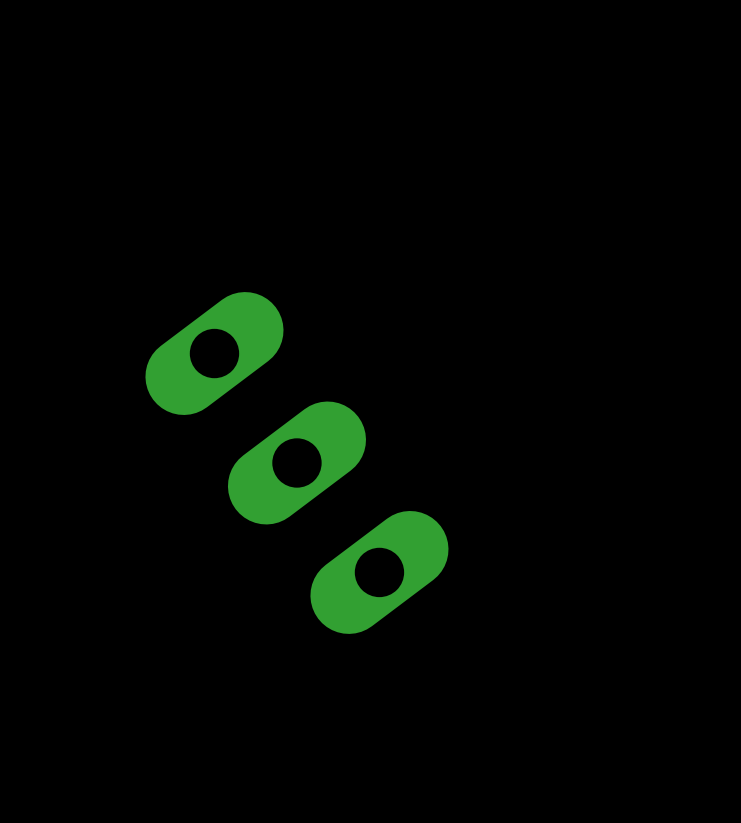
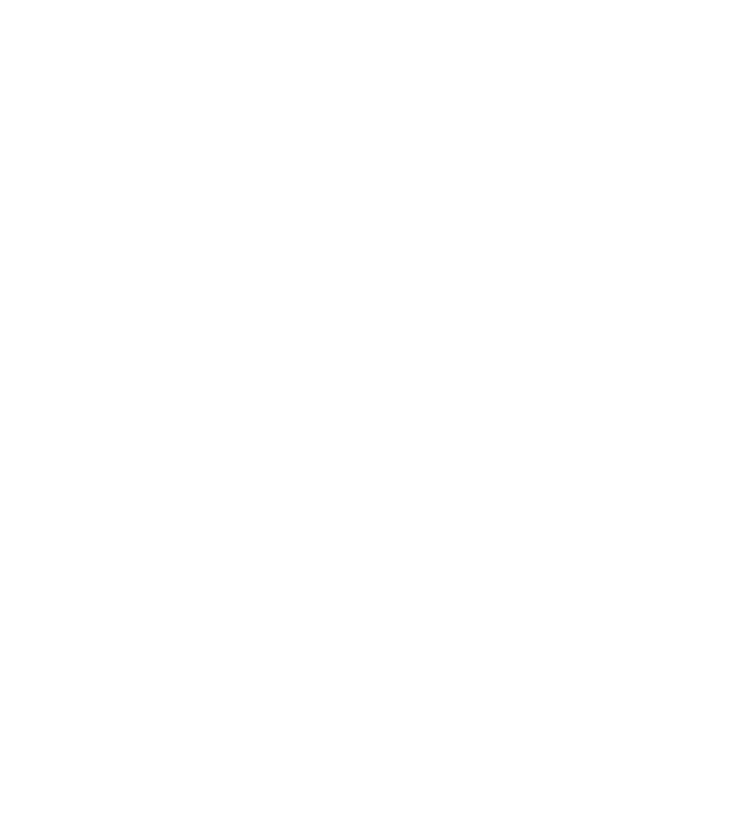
part: (296, 462) -> none

